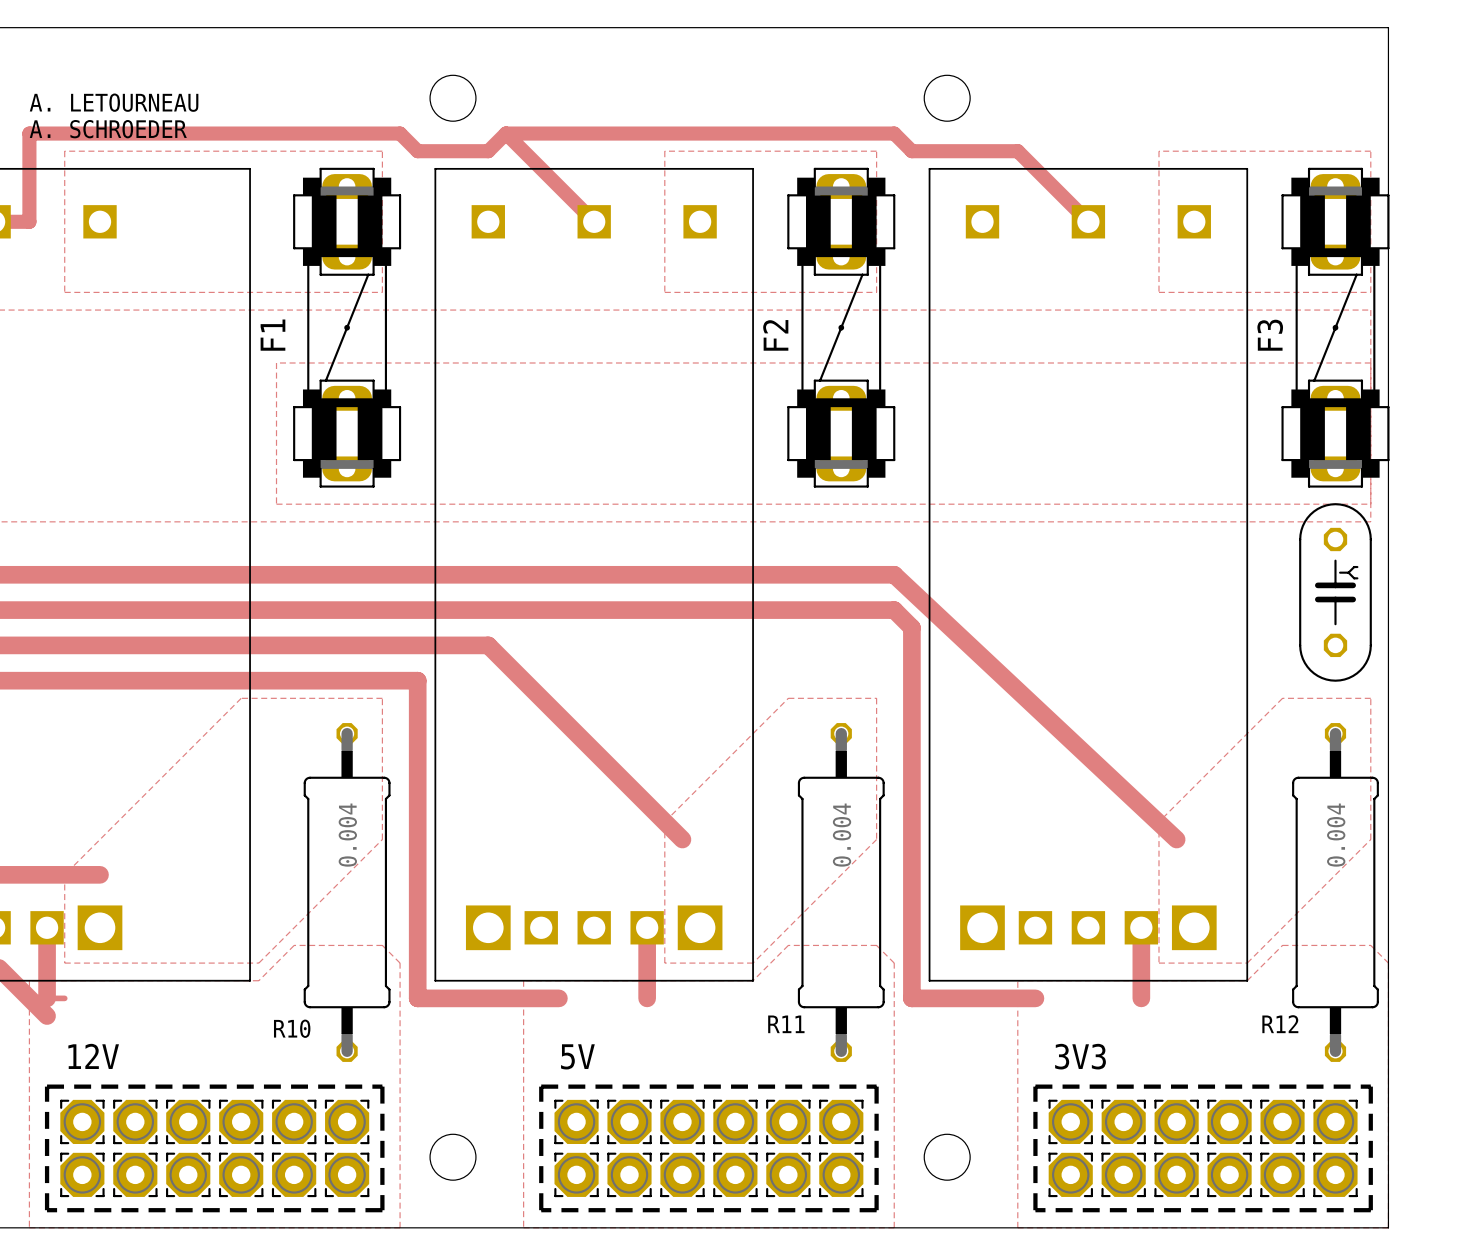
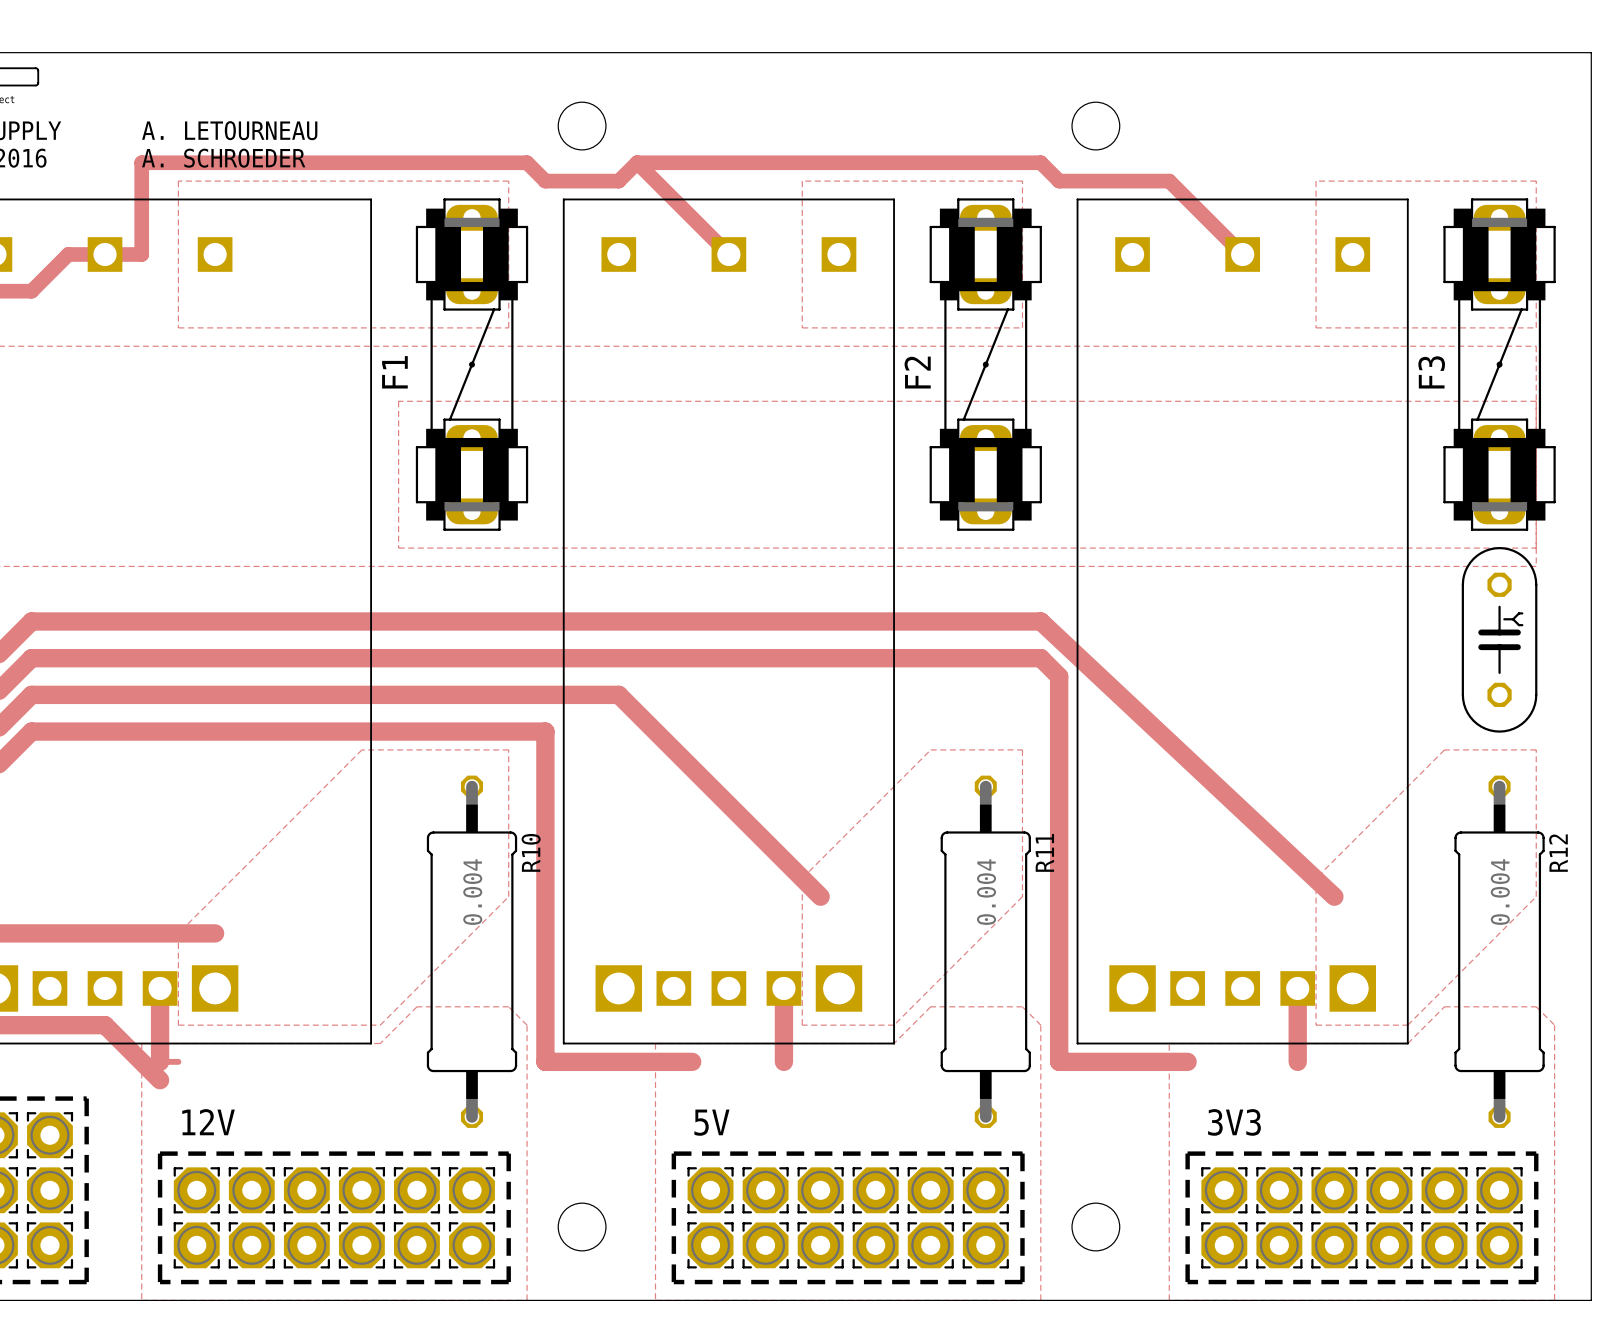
board edge: (1388, 27) (1388, 1227) -> (1554, 52) (1591, 52) (1591, 1300) (1554, 1300)
R11 name rotation: 0° (786, 1024) -> 90° counterclockwise (1044, 852)
R11 name position: R11 (786, 1024) -> R11 (1044, 852)
R12 name rotation: 0° (1280, 1024) -> 90° counterclockwise (1558, 853)
R12 name position: R12 (1280, 1024) -> R12 (1558, 853)
R10 name rotation: 0° (292, 1028) -> 90° counterclockwise (531, 852)
R10 name position: R10 (292, 1028) -> R10 (531, 852)

